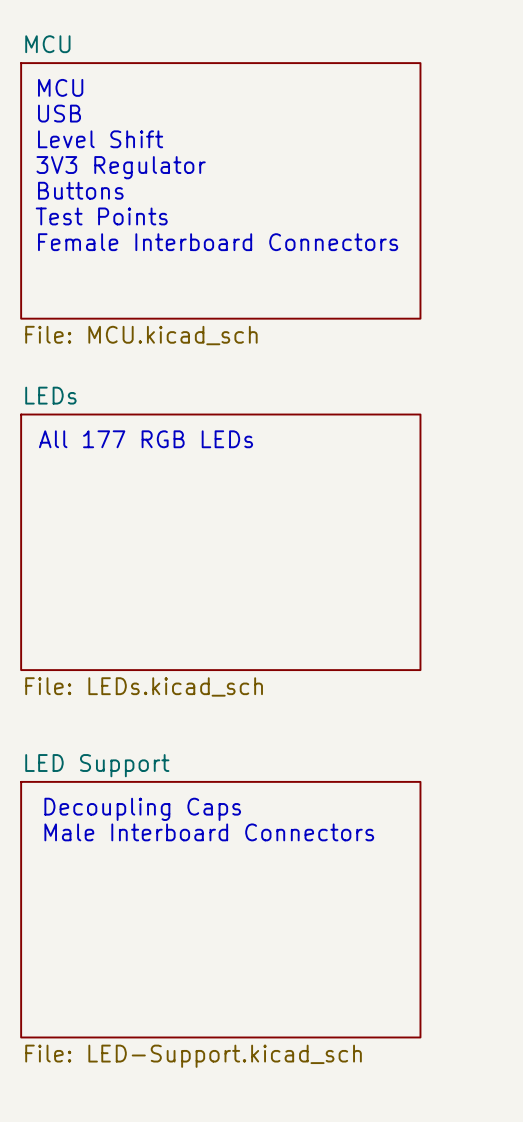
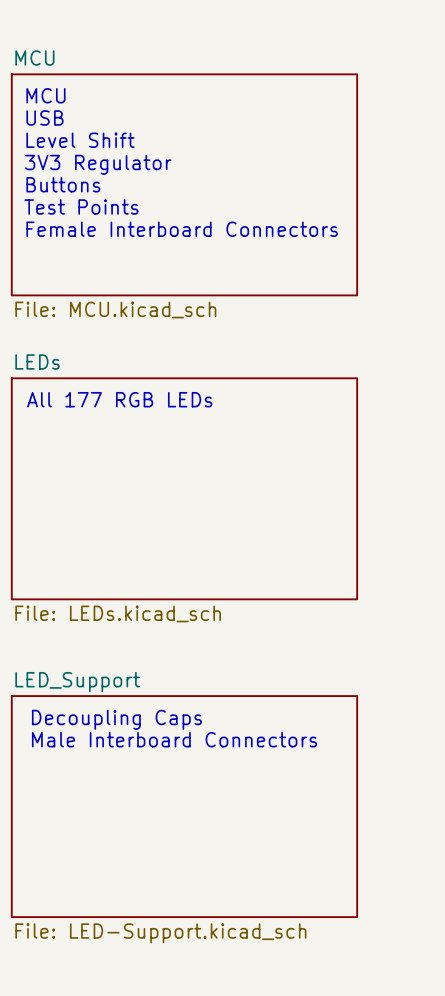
sheet LED Support name: LED Support (97, 765) -> LED_Support (77, 682)

